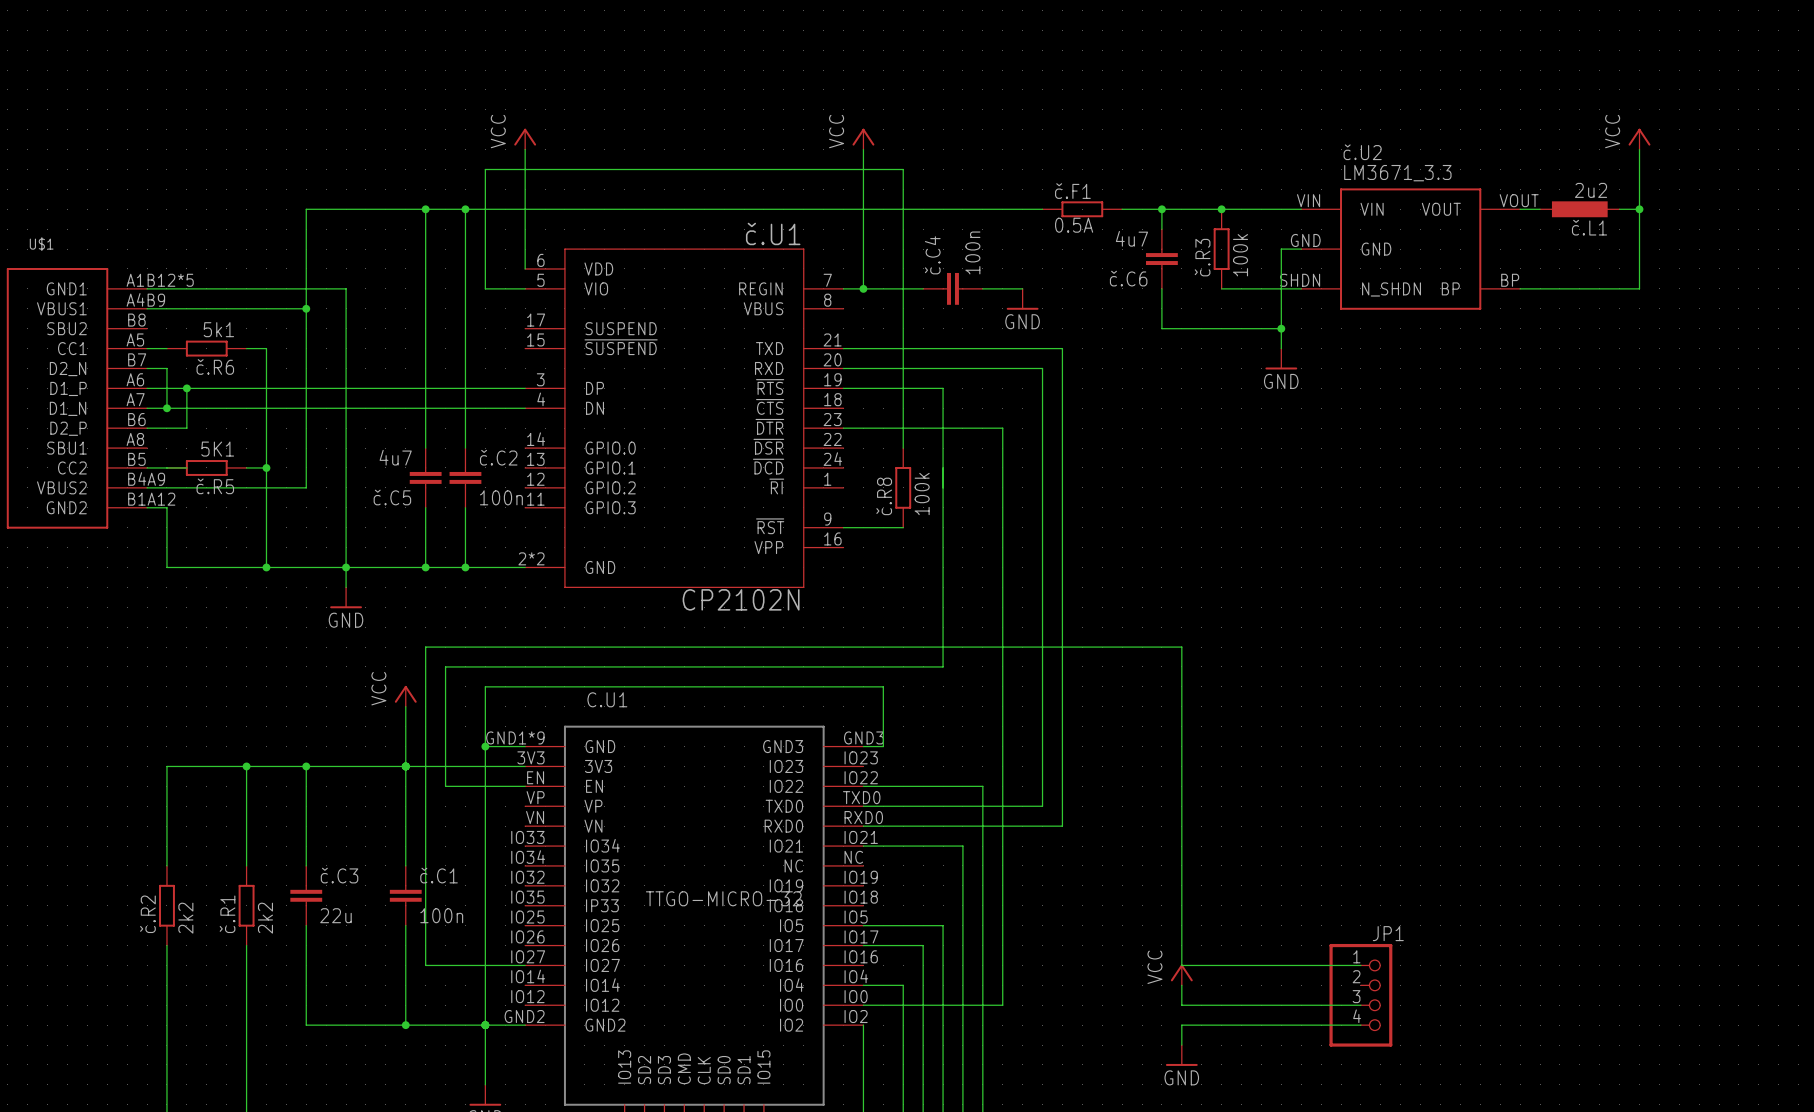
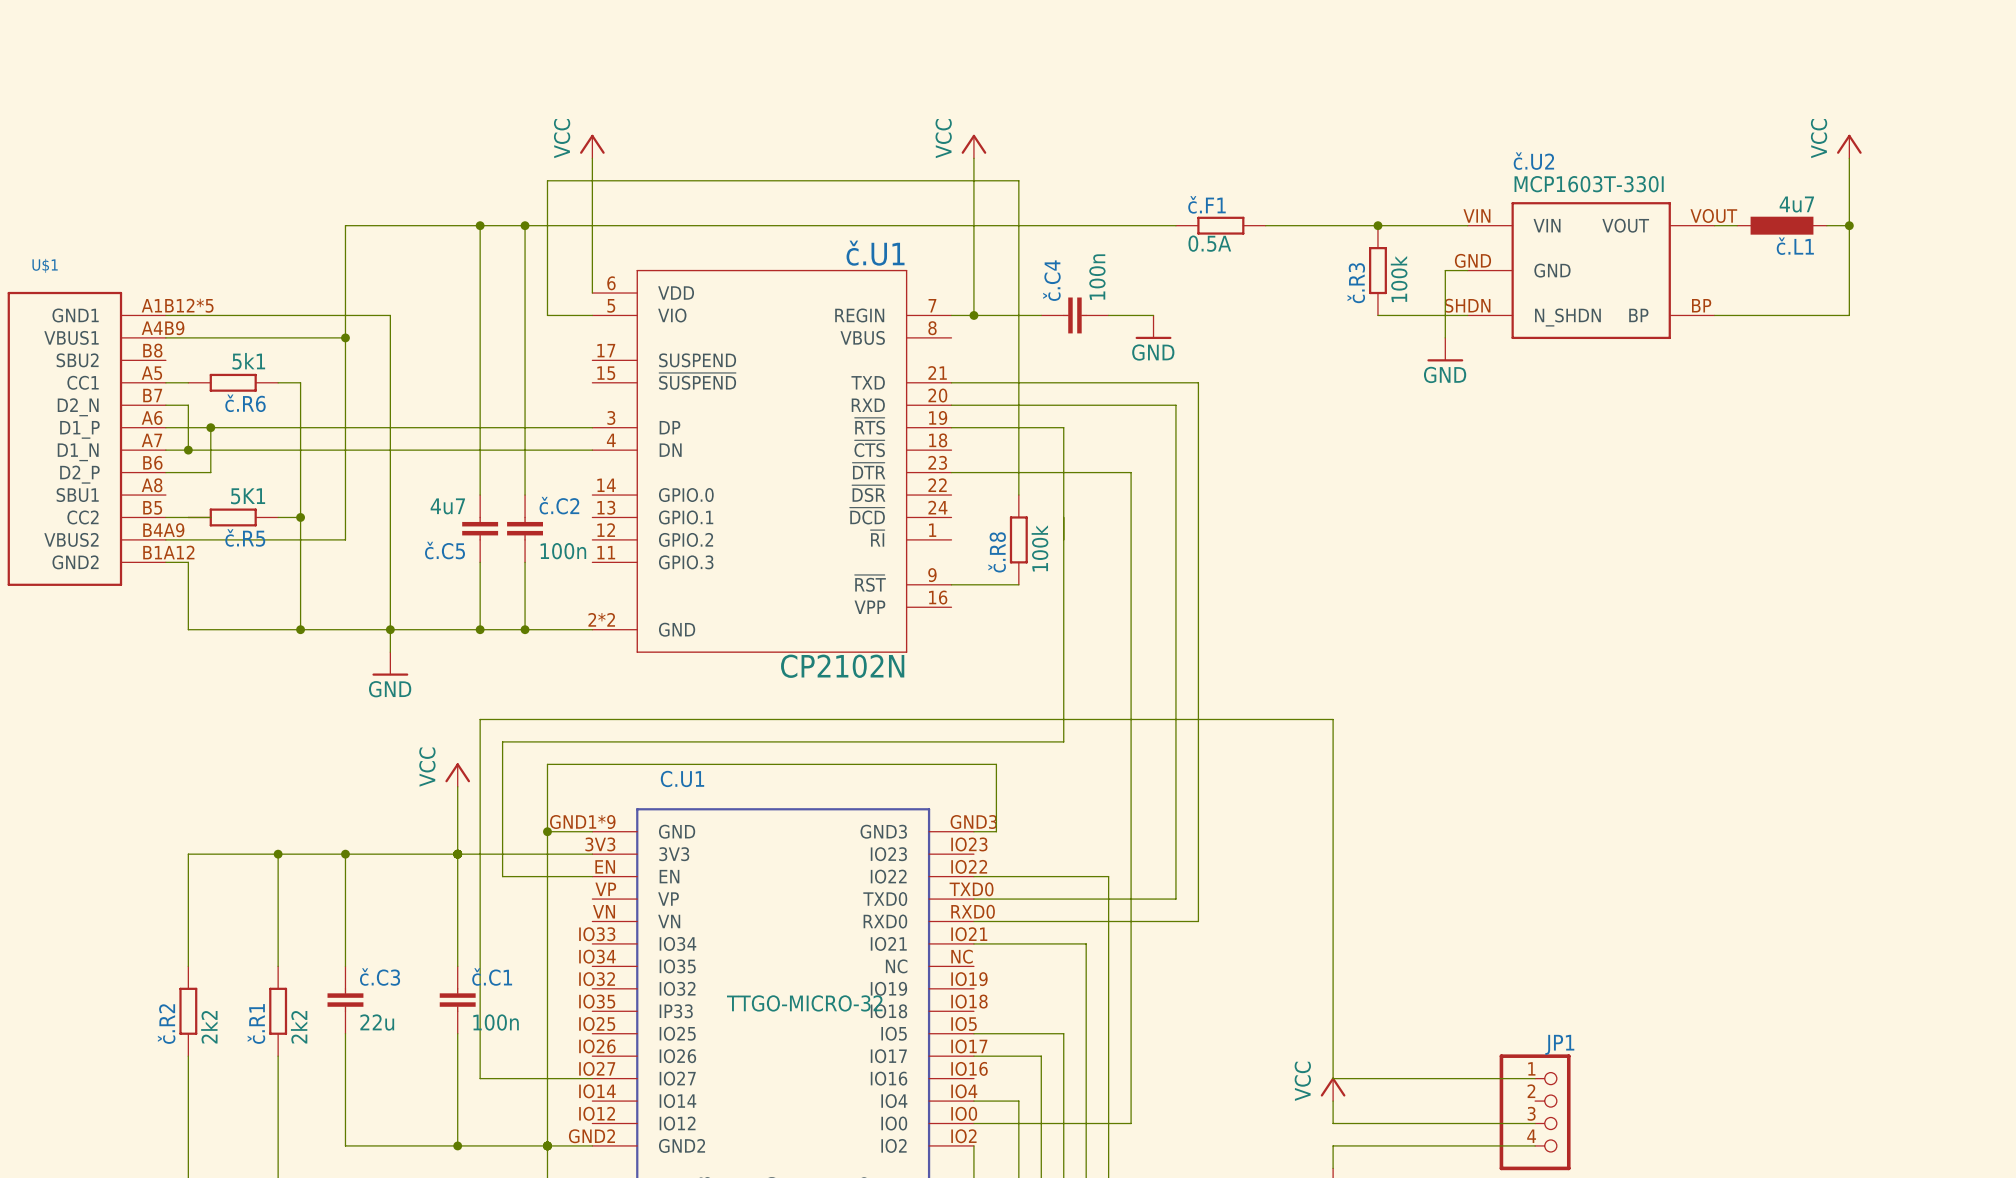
č.U2 value: LM3671_3.3 (1397, 173) -> MCP1603T-330I (1589, 184)
č.L1 value: 2u2 (1591, 190) -> 4u7 (1796, 204)
wire: (1161, 209) (1161, 229) -> none
junction: (1161, 209) -> none
č.C6: 4u7 (1161, 259) -> none
wire: (1161, 288) (1161, 328) (1281, 328) -> none
junction: (1281, 328) -> none
power symbol position: GND (1281, 359) -> GND (1445, 349)

